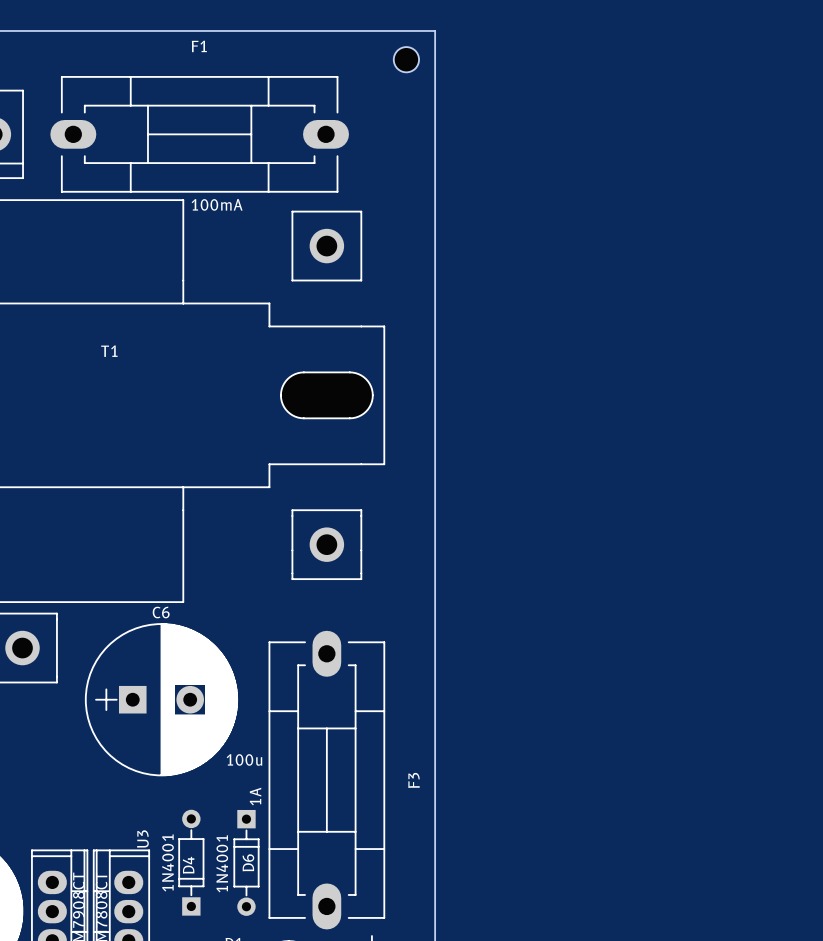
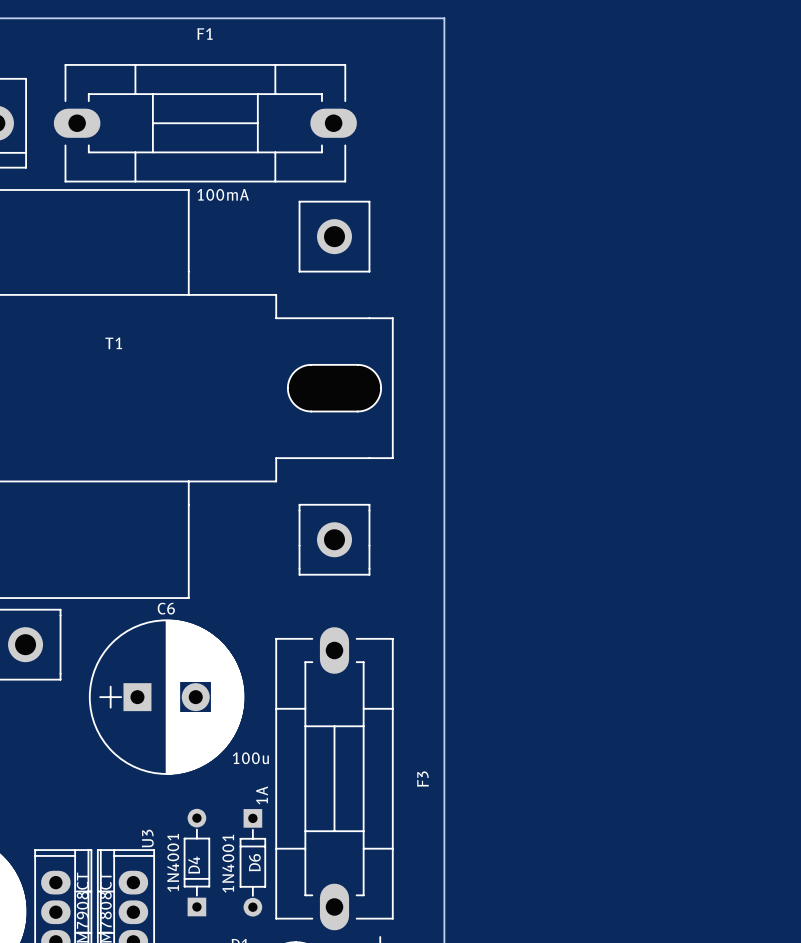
part: (406, 59) -> none

